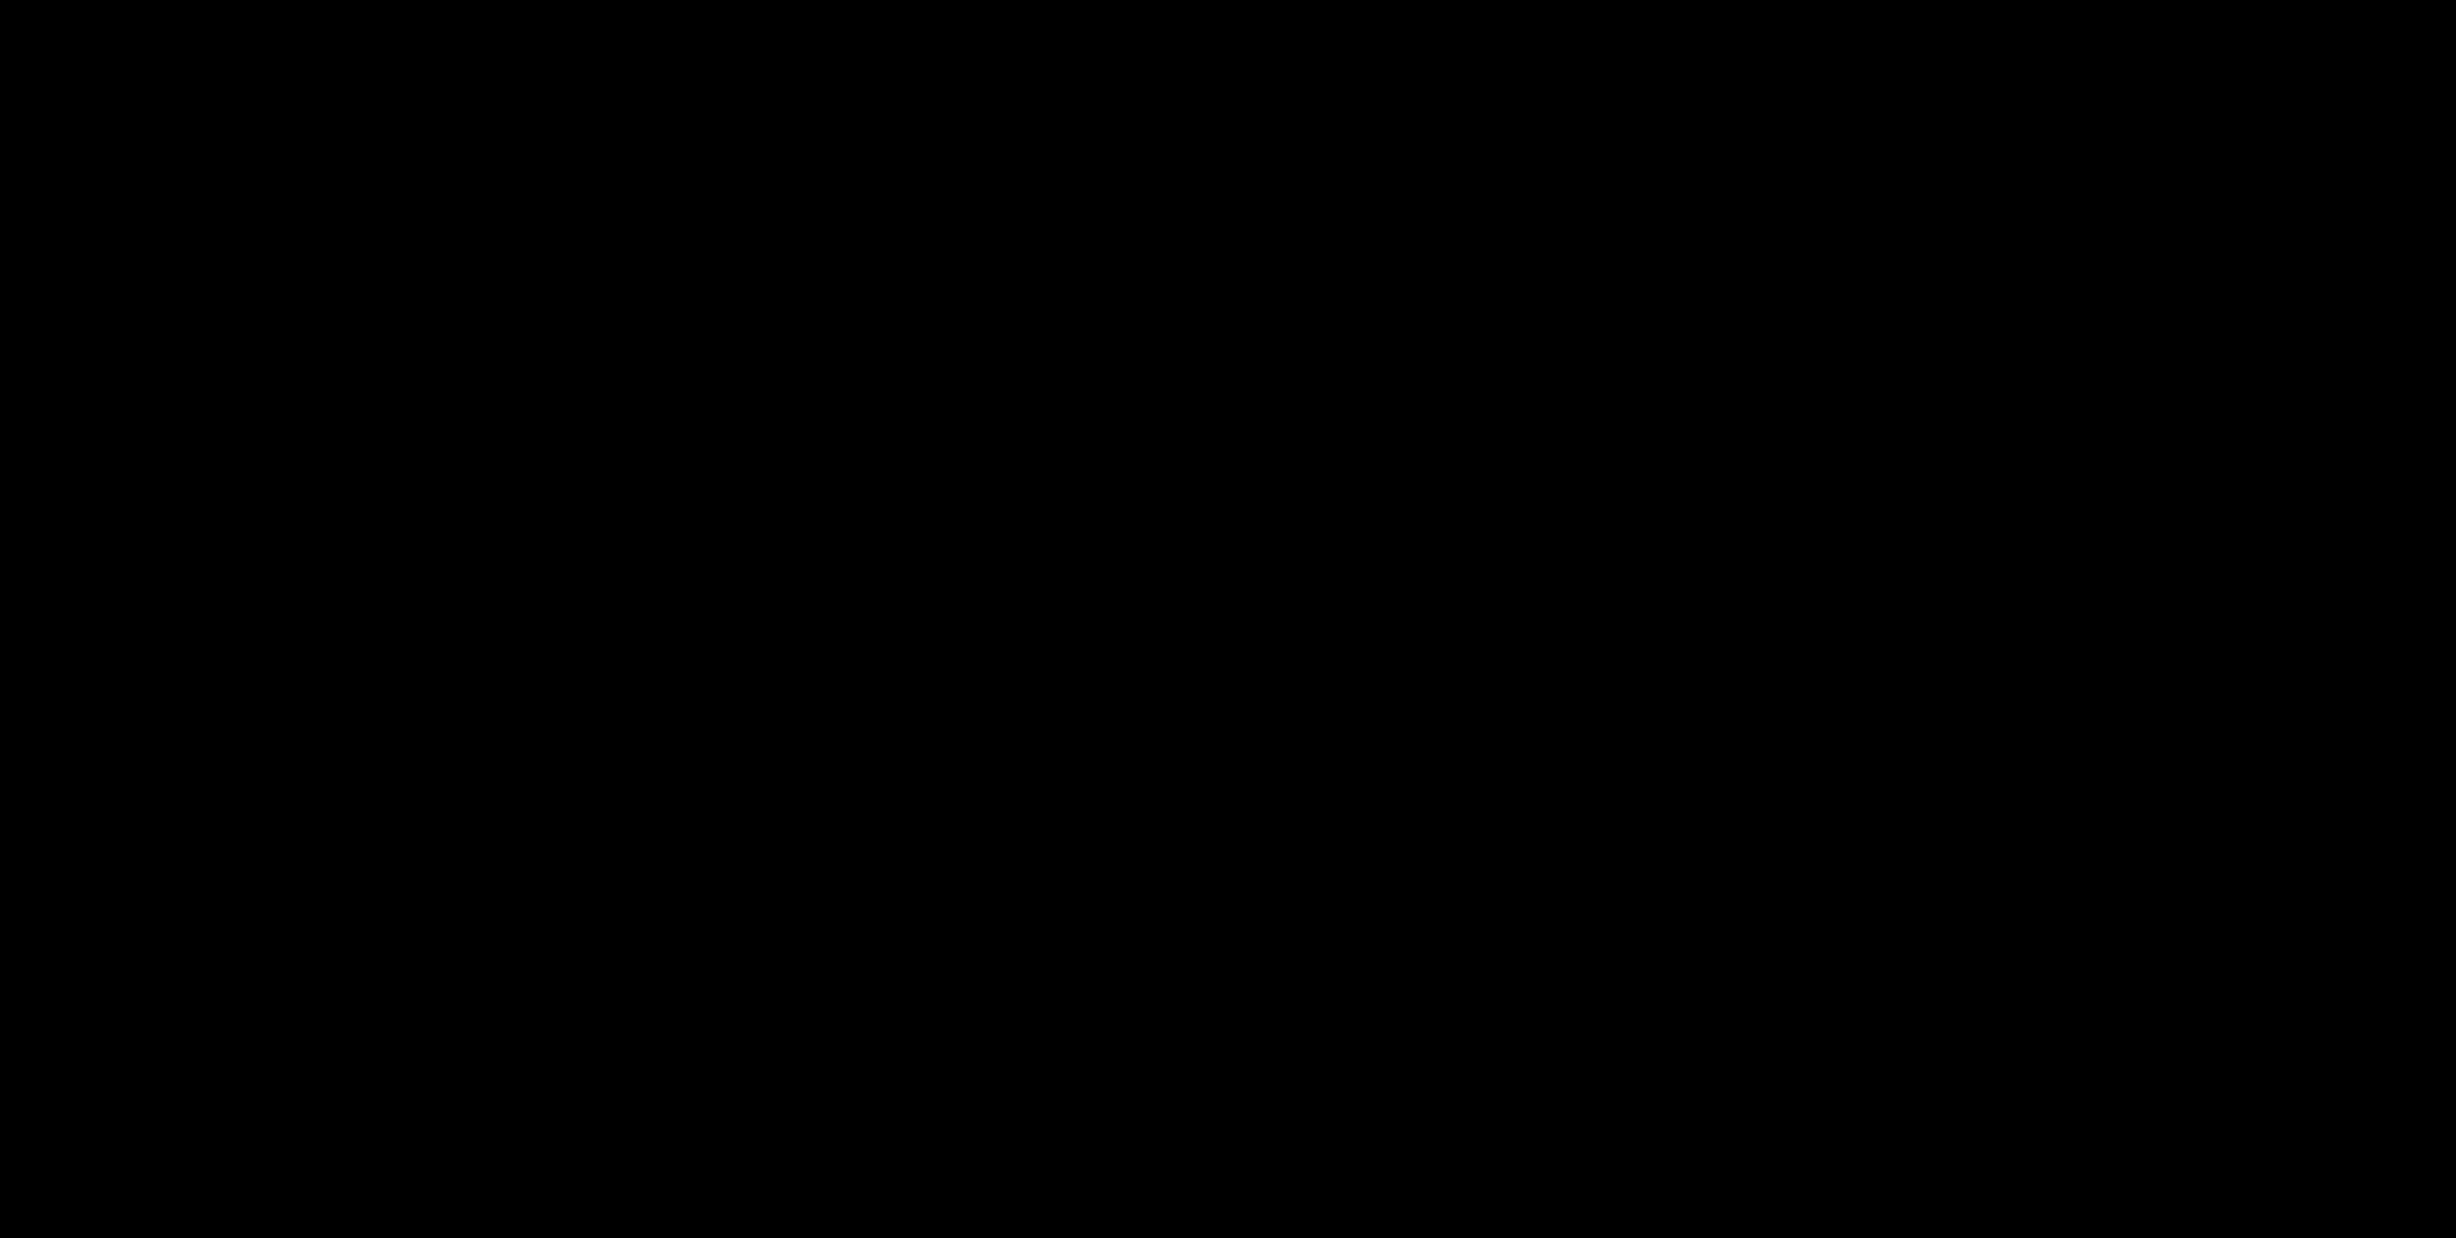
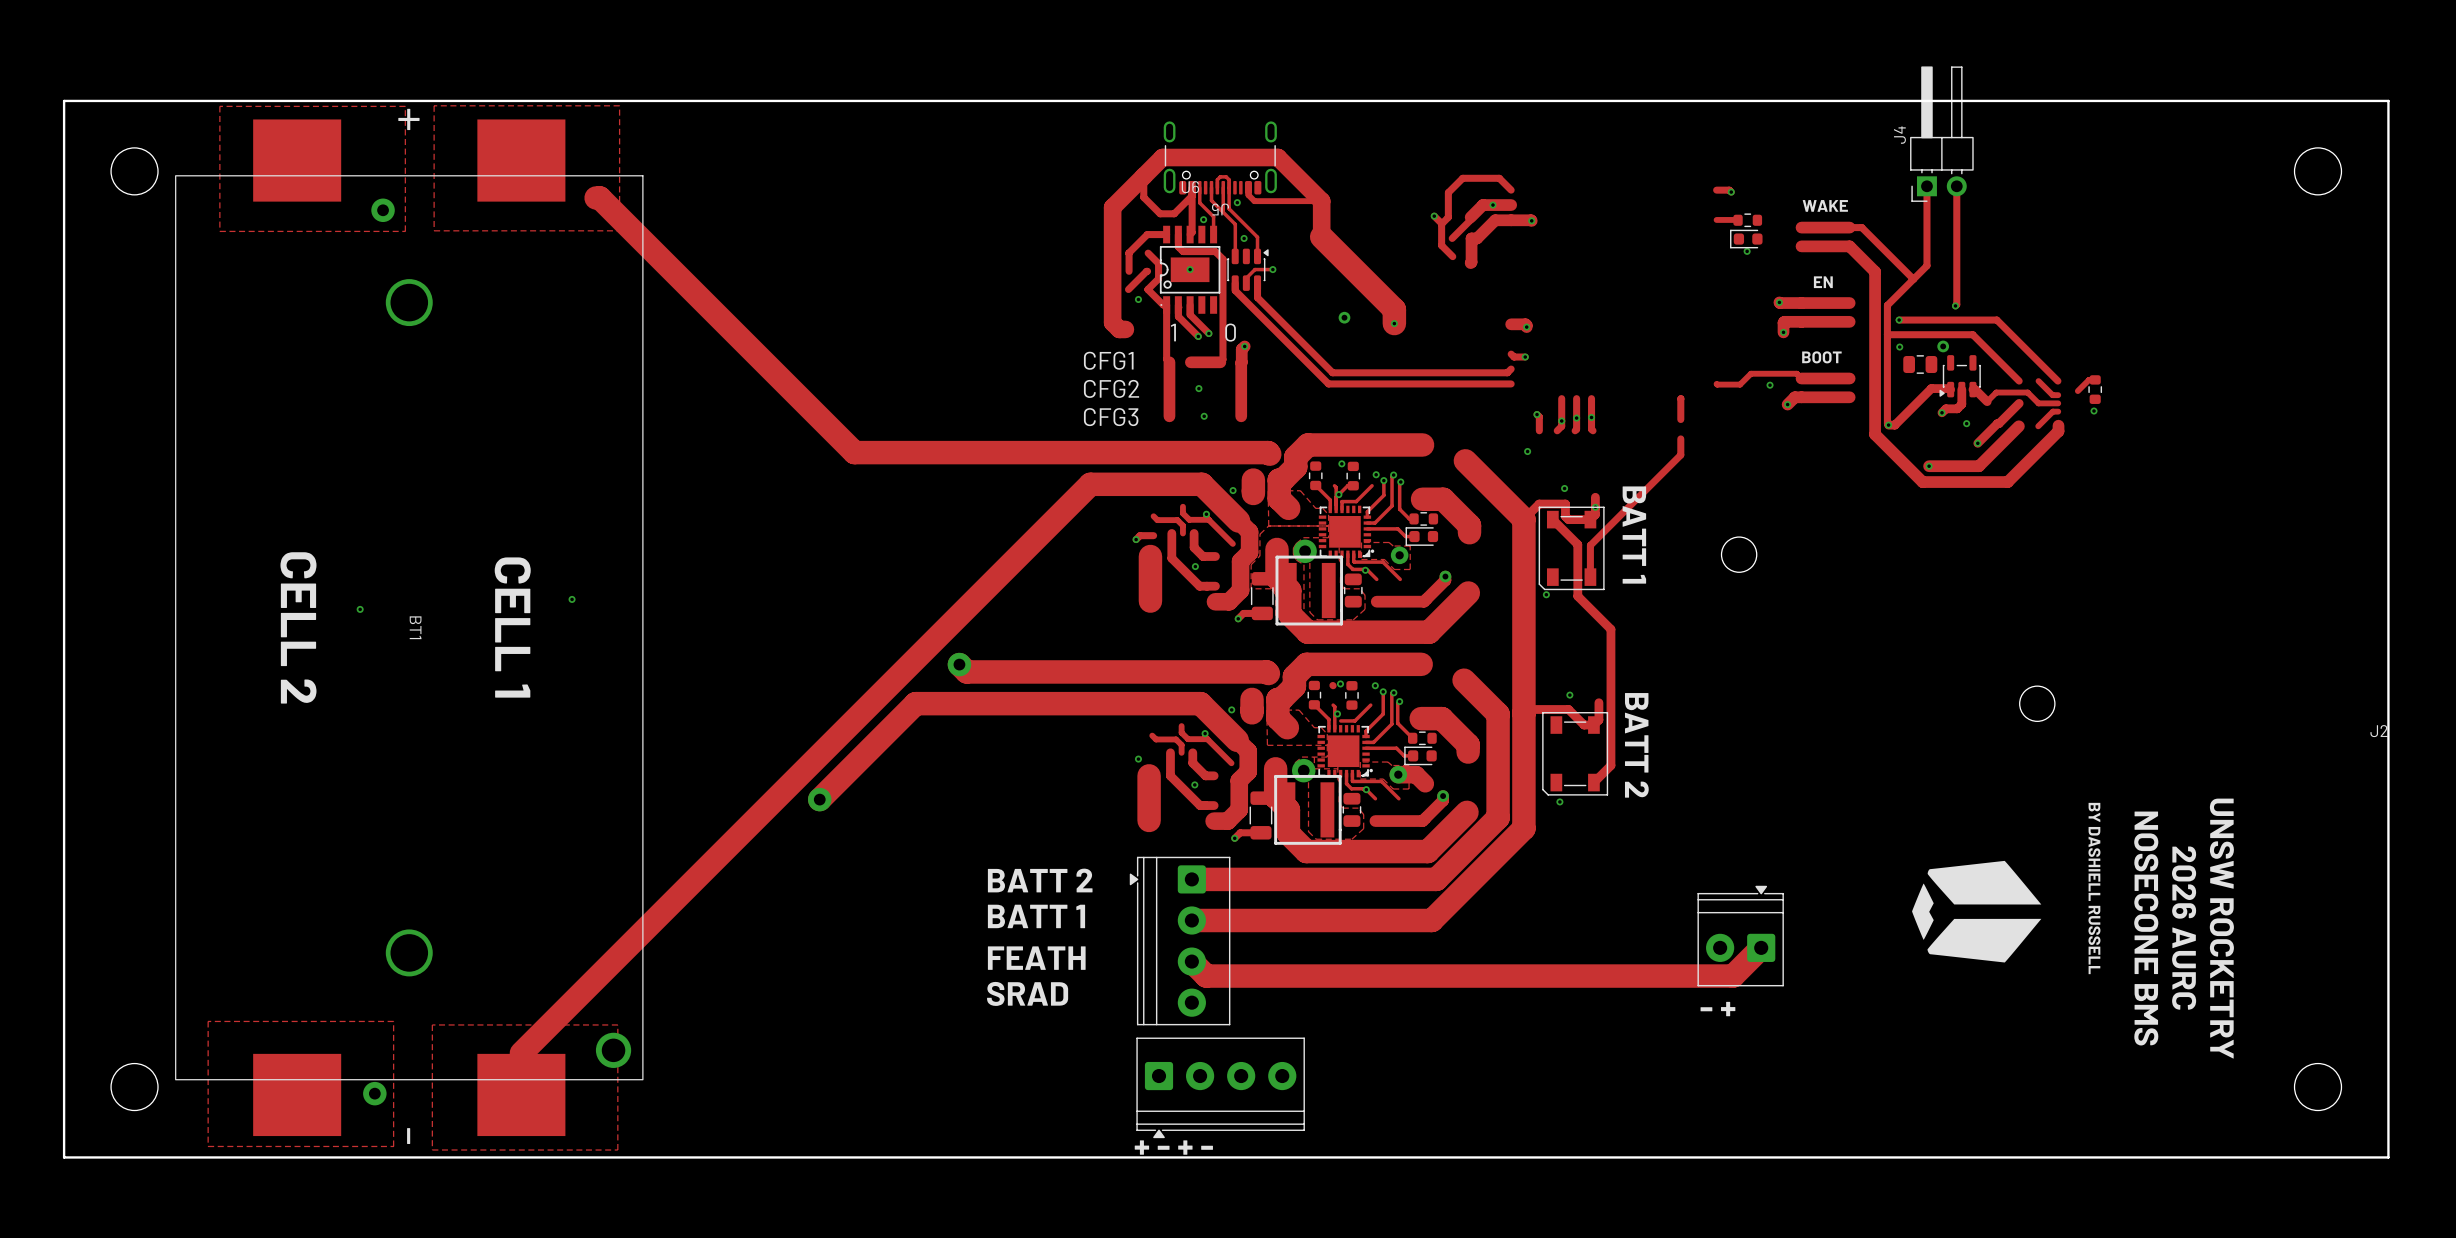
board edge: none -> (64, 100) (2388, 100) (2388, 1157) (64, 1157) (64, 100)
zone outline: none -> (434, 105) (434, 230) (619, 230) (619, 105) (434, 105)
zone outline: none -> (219, 106) (219, 231) (405, 231) (405, 106) (219, 106)
J4: none -> (1941, 134)
round board edge: none -> [110, 147, 159, 196]
round board edge: none -> [2293, 147, 2343, 196]
J5: none -> (1220, 157)
track: none -> (1143, 176) (1143, 197) (1160, 213) (1174, 213) (1192, 195)
track: none -> (1926, 186) (1926, 265) (1887, 305) (1887, 423) (1894, 425) (1931, 388) (1950, 389)
track: none -> (1956, 186) (1955, 305)
track: none -> (1192, 187) (1192, 232) (1190, 234)
track: none -> (1199, 187) (1199, 202) (1213, 216) (1213, 234)
track: none -> (1211, 187) (1211, 200) (1235, 224) (1235, 256)
track: none -> (1217, 187) (1217, 179) (1220, 176) (1226, 176) (1229, 179) (1229, 208) (1257, 237) (1257, 256)
track: none -> (1223, 187) (1223, 212)
track: none -> (1248, 187) (1248, 195) (1254, 201) (1321, 201)
track: none -> (1511, 190) (1499, 178) (1462, 178) (1448, 192) (1448, 217) (1441, 224)
track: none -> (1716, 190) (1729, 190) (1731, 192)
via: none -> (1731, 192)
track: none -> (596, 197) (599, 197) (854, 452) (1268, 452) (1269, 454)
track: none -> (1321, 201) (1321, 236) (1394, 309) (1394, 323)
track: none -> (1321, 201) (1278, 157) (1162, 157) (1112, 207) (1112, 322) (1119, 329) (1125, 329)
via: none -> (1237, 202)
via: none -> (1492, 205)
track: none -> (1511, 205) (1482, 205) (1452, 238)
text: none -> WAKE (1825, 205)
via: none -> (383, 210)
track: none -> (1434, 216) (1441, 223) (1441, 245) (1452, 256)
via: none -> (1434, 216)
via: none -> (1203, 219)
track: none -> (1716, 219) (1738, 220)
track: none -> (1531, 220) (1495, 220) (1477, 238) (1471, 238) (1470, 263)
via: none -> (1531, 220)
part: none -> (1747, 220)
track: none -> (1801, 227) (1861, 227) (1913, 279)
track: none -> (1166, 234) (1147, 234) (1128, 253) (1129, 271)
track: none -> (1178, 234) (1178, 246) (1183, 251) (1215, 251) (1222, 259) (1222, 359) (1220, 362) (1190, 362)
via: none -> (1244, 238)
part: none -> (1746, 239)
track: none -> (1801, 246) (1849, 246) (1875, 271) (1875, 434) (1922, 482) (2007, 482) (2058, 431) (2058, 425)
via: none -> (1747, 251)
track: none -> (1148, 253) (1158, 263) (1158, 278) (1147, 289) (1163, 304) (1166, 304) (1169, 416)
U6: none -> (1190, 269)
via: none -> (1190, 269)
part: none -> (1248, 269)
track: none -> (1272, 269) (1254, 269) (1246, 278) (1246, 283)
via: none -> (1272, 269)
track: none -> (1147, 271) (1128, 289)
text: none -> EN (1823, 282)
track: none -> (1235, 283) (1235, 290) (1328, 383) (1511, 383)
track: none -> (1257, 283) (1257, 297) (1332, 372) (1507, 372) (1511, 369)
via: none -> (1138, 299)
track: none -> (1779, 302) (1849, 303)
via: none -> (1779, 302)
track: none -> (1190, 304) (1190, 314) (1208, 333)
via: none -> (1955, 305)
track: none -> (1180, 307) (1178, 304) (1178, 316) (1198, 336)
via: none -> (1344, 317)
track: none -> (1899, 320) (1996, 320) (2057, 381)
via: none -> (1899, 320)
track: none -> (1849, 321) (1784, 321) (1783, 332)
via: none -> (1394, 323)
track: none -> (1511, 324) (1525, 324) (1526, 327)
via: none -> (1526, 327)
text: none -> 1 (1173, 332)
text: none -> 0 (1230, 332)
via: none -> (1783, 332)
via: none -> (1208, 333)
track: none -> (1887, 334) (1972, 334) (2019, 381)
via: none -> (1198, 336)
track: none -> (1244, 346) (1241, 349) (1241, 416)
via: none -> (1244, 346)
via: none -> (1943, 346)
via: none -> (1899, 347)
track: none -> (1511, 354) (1514, 357) (1525, 357)
via: none -> (1525, 357)
text: none -> BOOT (1821, 357)
text: none -> CFG1 (1108, 360)
part: none -> (1920, 364)
part: none -> (1960, 376)
track: none -> (1849, 378) (1801, 378) (1796, 373) (1750, 373) (1740, 384) (1716, 383)
track: none -> (2095, 379) (2089, 379) (2077, 391)
track: none -> (2038, 381) (2052, 395) (2058, 395)
via: none -> (1770, 385)
text: none -> CFG2 (1111, 388)
via: none -> (1198, 388)
track: none -> (1961, 389) (1961, 404) (1957, 408) (1945, 408) (1942, 412)
track: none -> (1972, 389) (1987, 401) (1996, 392) (2027, 392) (2038, 403) (2058, 403)
part: none -> (2095, 389)
track: none -> (1849, 397) (1794, 397) (1787, 404)
track: none -> (1561, 398) (1561, 426) (1557, 430)
track: none -> (1576, 398) (1575, 430)
track: none -> (1591, 398) (1593, 430)
track: none -> (1680, 398) (1680, 419)
track: none -> (2019, 403) (1977, 443)
via: none -> (1787, 404)
track: none -> (2058, 411) (2052, 411) (2038, 426)
via: none -> (2094, 411)
via: none -> (1942, 412)
track: none -> (1537, 414) (1539, 416) (1539, 430)
via: none -> (1537, 414)
via: none -> (1204, 416)
text: none -> CFG3 (1111, 417)
via: none -> (1591, 417)
via: none -> (1576, 418)
via: none -> (1561, 421)
via: none -> (1966, 423)
via: none -> (1888, 425)
track: none -> (2018, 426) (1978, 466) (1929, 466)
track: none -> (1680, 438) (1680, 455) (1590, 545) (1590, 577)
via: none -> (1977, 443)
track: none -> (1422, 444) (1307, 444) (1295, 457) (1295, 467) (1282, 480) (1279, 480) (1279, 498) (1288, 508)
via: none -> (1527, 451)
track: none -> (1465, 460) (1523, 519)
via: none -> (1341, 463)
via: none -> (1929, 466)
via: none -> (1376, 474)
part: none -> (1315, 475)
track: none -> (1393, 475) (1392, 476) (1392, 505) (1374, 523) (1367, 523)
via: none -> (1393, 475)
part: none -> (1353, 476)
track: none -> (1253, 480) (1253, 493)
track: none -> (1383, 480) (1383, 495) (1367, 511) (1367, 517)
via: none -> (1383, 480)
track: none -> (1400, 481) (1399, 509) (1409, 518) (1414, 518)
via: none -> (1400, 481)
track: none -> (1315, 485) (1330, 500) (1330, 509)
track: none -> (1334, 485) (1336, 487) (1336, 509)
track: none -> (1353, 485) (1347, 485) (1336, 497)
track: none -> (1372, 485) (1356, 501) (1342, 501)
via: none -> (1564, 488)
via: none -> (1233, 490)
via: none -> (1338, 494)
track: none -> (1595, 497) (1595, 514) (1590, 519) (1568, 519) (1565, 516) (1565, 504) (1539, 504) (1523, 519)
track: none -> (1422, 499) (1443, 499) (1469, 525) (1469, 532)
track: none -> (1342, 501) (1342, 509)
track: none -> (1182, 506) (1182, 513) (1189, 519) (1208, 519)
via: none -> (1595, 507)
track: none -> (1206, 514) (1206, 517) (1232, 543)
via: none -> (1206, 514)
track: none -> (1153, 516) (1157, 520) (1177, 520) (1182, 525) (1182, 533)
part: none -> (1423, 518)
track: none -> (1523, 519) (1523, 828) (1431, 920) (1191, 920)
track: none -> (1552, 519) (1577, 544) (1577, 596) (1610, 629) (1610, 765) (1593, 782)
zone outline: none -> (1268, 525) (1259, 534) (1259, 555) (1251, 564) (1251, 588) (1271, 588) (1275, 594) (1275, 615) (1303, 615) (1303, 564) (1296, 560) (1293, 554) (1293, 548) (1303, 537) (1339, 537) (1340, 582) (1343, 588) (1359, 588) (1365, 595) (1365, 609) (1353, 619) (1317, 619) (1309, 612) (1309, 562)
zone outline: none -> (1268, 525) (1328, 525)
zone outline: none -> (1268, 525) (1268, 490) (1300, 490) (1315, 508) (1322, 508) (1328, 514) (1328, 537)
track: none -> (1367, 528) (1397, 528) (1405, 536) (1414, 536)
part: none -> (1346, 531)
track: none -> (1171, 533) (1171, 558) (1199, 586) (1215, 586) (1206, 586)
track: none -> (1194, 533) (1194, 547) (1203, 556) (1215, 556)
track: none -> (1153, 535) (1140, 535) (1136, 539)
part: none -> (1421, 536)
round board edge: none -> [1720, 536, 1758, 573]
via: none -> (1136, 539)
zone outline: none -> (1361, 542) (1361, 559) (1384, 559) (1394, 569) (1410, 569) (1410, 546) (1393, 546) (1389, 542) (1361, 542)
text: none -> BATT 1 (1634, 535)
part: none -> (1571, 548)
track: none -> (1276, 549) (1276, 577) (1289, 590) (1289, 614) (1307, 632) (1429, 632) (1468, 592)
via: none -> (1305, 551)
track: none -> (1347, 554) (1347, 564) (1352, 569) (1367, 570) (1376, 579)
track: none -> (1353, 554) (1354, 562) (1382, 562) (1400, 579)
via: none -> (1399, 555)
track: none -> (1150, 556) (1150, 601)
via: none -> (1195, 566)
via: none -> (1365, 570)
track: none -> (1445, 576) (1445, 580) (1424, 601) (1376, 601)
via: none -> (1445, 576)
part: none -> (1309, 590)
part: none -> (1353, 590)
via: none -> (1546, 594)
part: none -> (1262, 596)
via: none -> (572, 599)
track: none -> (1215, 601) (1229, 601) (1240, 590) (1240, 561) (1249, 552) (1249, 531) (1201, 484) (1090, 484) (521, 1053)
via: none -> (360, 609)
track: none -> (1262, 613) (1243, 613) (1238, 618)
via: none -> (1238, 618)
BT1: none -> (409, 627)
track: none -> (959, 664) (966, 671) (1266, 671) (1268, 673)
via: none -> (959, 664)
track: none -> (1421, 664) (1306, 664) (1294, 676) (1294, 686) (1281, 699) (1277, 699) (1277, 718) (1287, 727)
track: none -> (1464, 680) (1498, 714) (1498, 817) (1436, 879) (1191, 879)
via: none -> (1340, 683)
track: none -> (1332, 685) (1333, 685)
via: none -> (1375, 685)
round board edge: none -> [2019, 685, 2056, 722]
track: none -> (1383, 691) (1383, 714) (1366, 731) (1366, 736)
via: none -> (1383, 691)
track: none -> (1393, 692) (1391, 693) (1391, 724) (1373, 742) (1366, 742)
via: none -> (1393, 692)
part: none -> (1314, 695)
part: none -> (1351, 695)
via: none -> (1569, 695)
track: none -> (1252, 699) (1252, 712)
track: none -> (1399, 701) (1397, 703) (1397, 723) (1412, 738)
via: none -> (1399, 701)
track: none -> (1598, 702) (1598, 720) (1593, 725) (1584, 725) (1568, 709) (1527, 709) (1523, 713)
track: none -> (1314, 704) (1328, 719) (1328, 728)
track: none -> (1333, 705) (1334, 706) (1334, 728)
track: none -> (1370, 705) (1354, 720) (1340, 720)
via: none -> (1231, 709)
via: none -> (1337, 713)
track: none -> (1421, 718) (1441, 718) (1468, 744) (1468, 752)
track: none -> (1181, 726) (1181, 732) (1188, 739) (1207, 739)
text: none -> J2 (2379, 731)
track: none -> (1205, 733) (1205, 736) (1231, 763)
via: none -> (1205, 733)
track: none -> (1152, 735) (1156, 739) (1176, 739) (1181, 745) (1181, 752)
part: none -> (1422, 738)
zone outline: none -> (1327, 745) (1267, 745) (1266, 710) (1299, 710) (1314, 727) (1321, 727) (1327, 734) (1327, 757)
track: none -> (1366, 748) (1396, 748) (1404, 755) (1413, 755)
part: none -> (1345, 751)
track: none -> (1170, 752) (1170, 775) (1200, 805) (1214, 805) (1205, 805)
track: none -> (1192, 752) (1192, 763) (1205, 775) (1214, 775)
part: none -> (1575, 753)
text: none -> BATT 2 (1636, 745)
part: none -> (1420, 755)
zone outline: none -> (1314, 757) (1314, 768) (1337, 768)
via: none -> (1138, 759)
zone outline: none -> (1295, 762) (1302, 757) (1337, 757) (1339, 802) (1342, 808) (1358, 808) (1363, 814) (1363, 828) (1351, 839) (1316, 839) (1308, 831) (1308, 782)
zone outline: none -> (1360, 762) (1360, 779) (1383, 779) (1393, 789) (1409, 789) (1409, 765) (1392, 765) (1387, 762) (1360, 762)
track: none -> (1275, 768) (1275, 797) (1288, 809) (1288, 833) (1306, 851) (1427, 851) (1466, 812)
via: none -> (1303, 770)
track: none -> (1346, 773) (1346, 783) (1351, 788) (1366, 789) (1375, 798)
track: none -> (1352, 773) (1353, 781) (1381, 781) (1398, 798)
track: none -> (1398, 774) (1416, 774) (1425, 783)
via: none -> (1398, 774)
track: none -> (1149, 775) (1149, 820)
via: none -> (1194, 784)
via: none -> (1366, 789)
track: none -> (1443, 796) (1443, 800) (1422, 821) (1375, 821)
via: none -> (1443, 796)
track: none -> (819, 799) (915, 703) (1200, 703) (1248, 751) (1248, 771) (1239, 780) (1239, 809) (1227, 821) (1214, 821)
via: none -> (819, 799)
via: none -> (1559, 801)
part: none -> (1307, 809)
part: none -> (1351, 809)
part: none -> (1260, 815)
track: none -> (1260, 832) (1240, 832) (1234, 838)
via: none -> (1234, 838)
drawing: none -> [1912, 860, 2042, 963]
text: none -> BATT 2 (1040, 880)
text: none -> BY DASHIELL RUSSELL (2094, 888)
text: none -> BATT 1 (1036, 916)
text: none -> 2026 AURC (2184, 928)
text: none -> NOSECONE BMS (2146, 928)
text: none -> UNSW ROCKETRY (2221, 928)
part: none -> (1740, 936)
part: none -> (1180, 941)
track: none -> (1761, 947) (1733, 976) (1206, 976) (1191, 961)
text: none -> FEATH (1036, 958)
text: none -> SRAD (1027, 993)
text: none -> - + (1717, 1009)
zone outline: none -> (208, 1021) (208, 1146) (393, 1146) (393, 1021) (208, 1021)
zone outline: none -> (432, 1024) (432, 1149) (617, 1149) (617, 1024) (432, 1024)
round board edge: none -> [110, 1062, 159, 1112]
round board edge: none -> [2293, 1062, 2343, 1112]
part: none -> (1220, 1087)
via: none -> (374, 1093)
text: none -> + - + - (1173, 1147)

